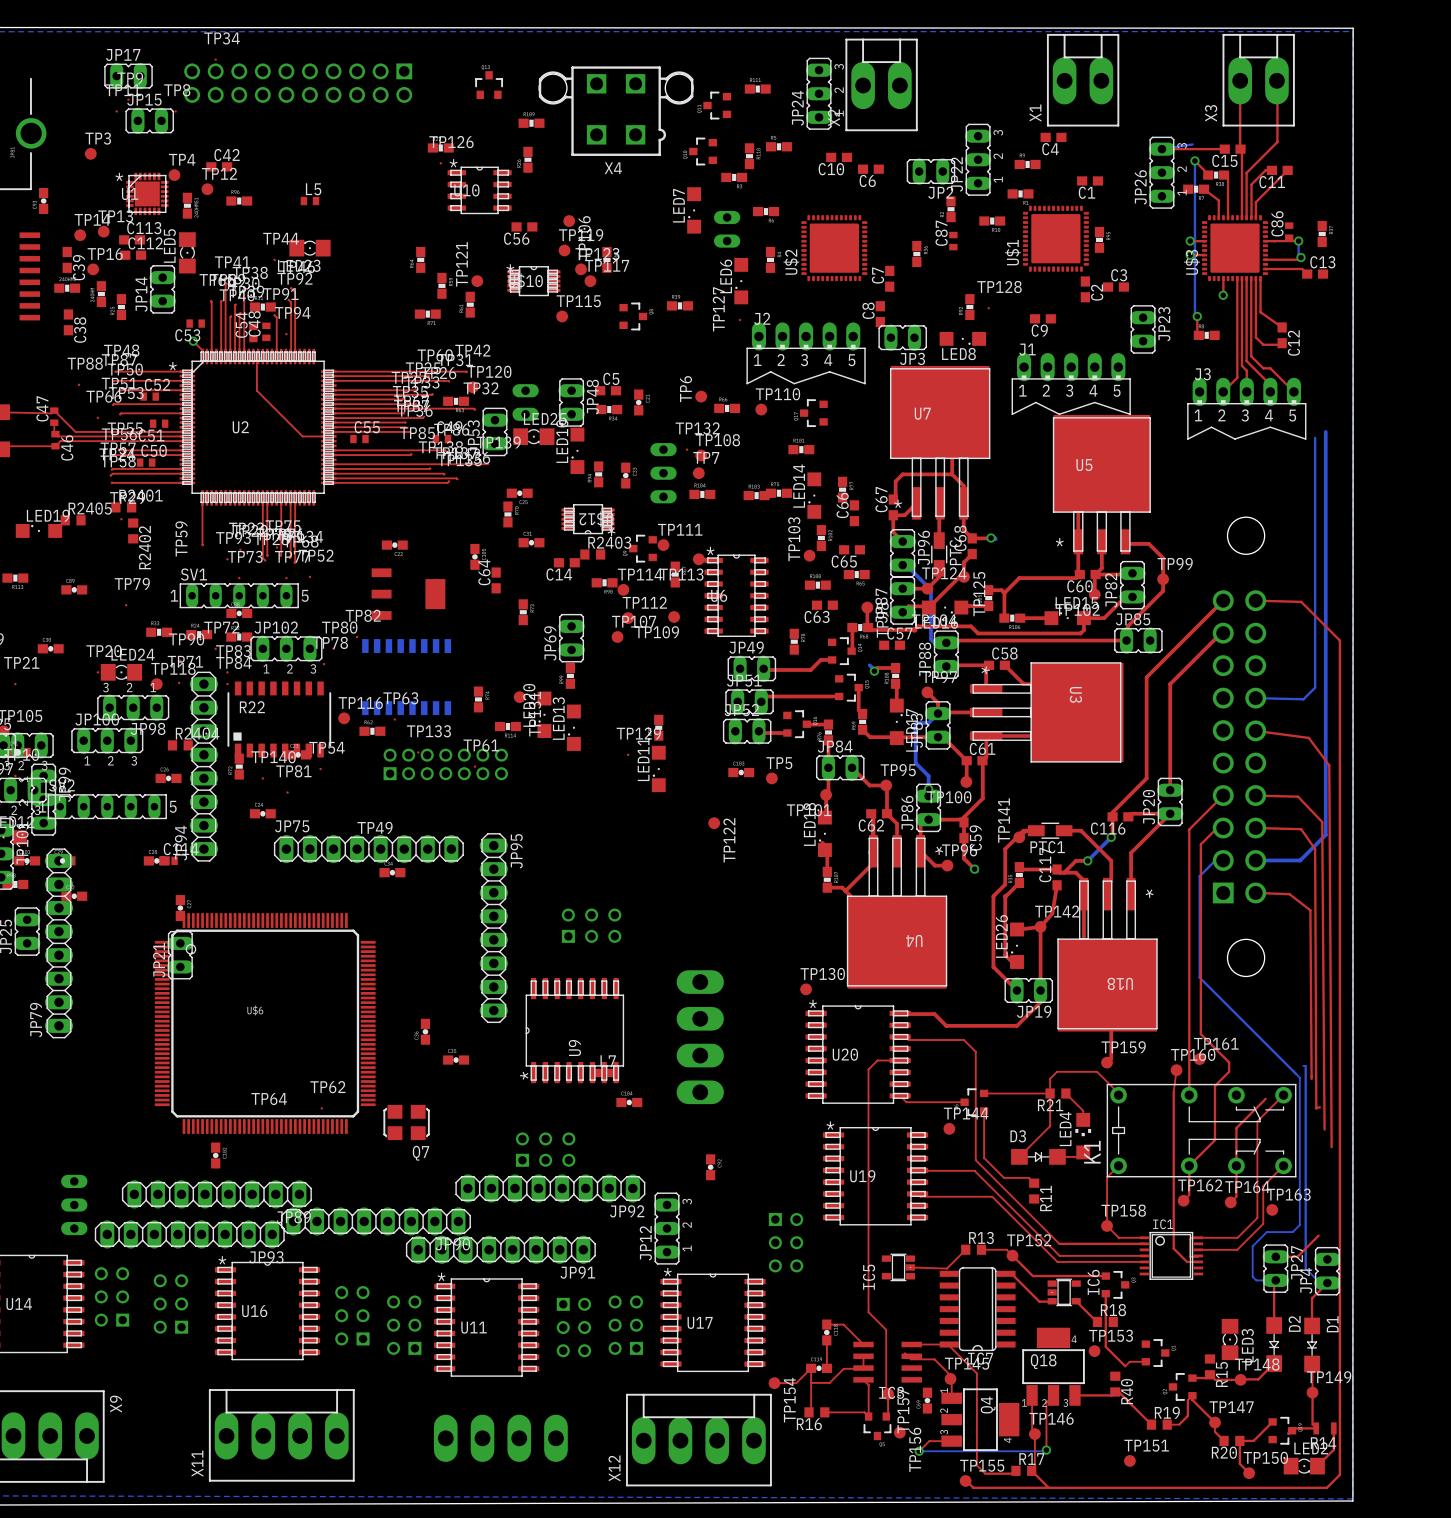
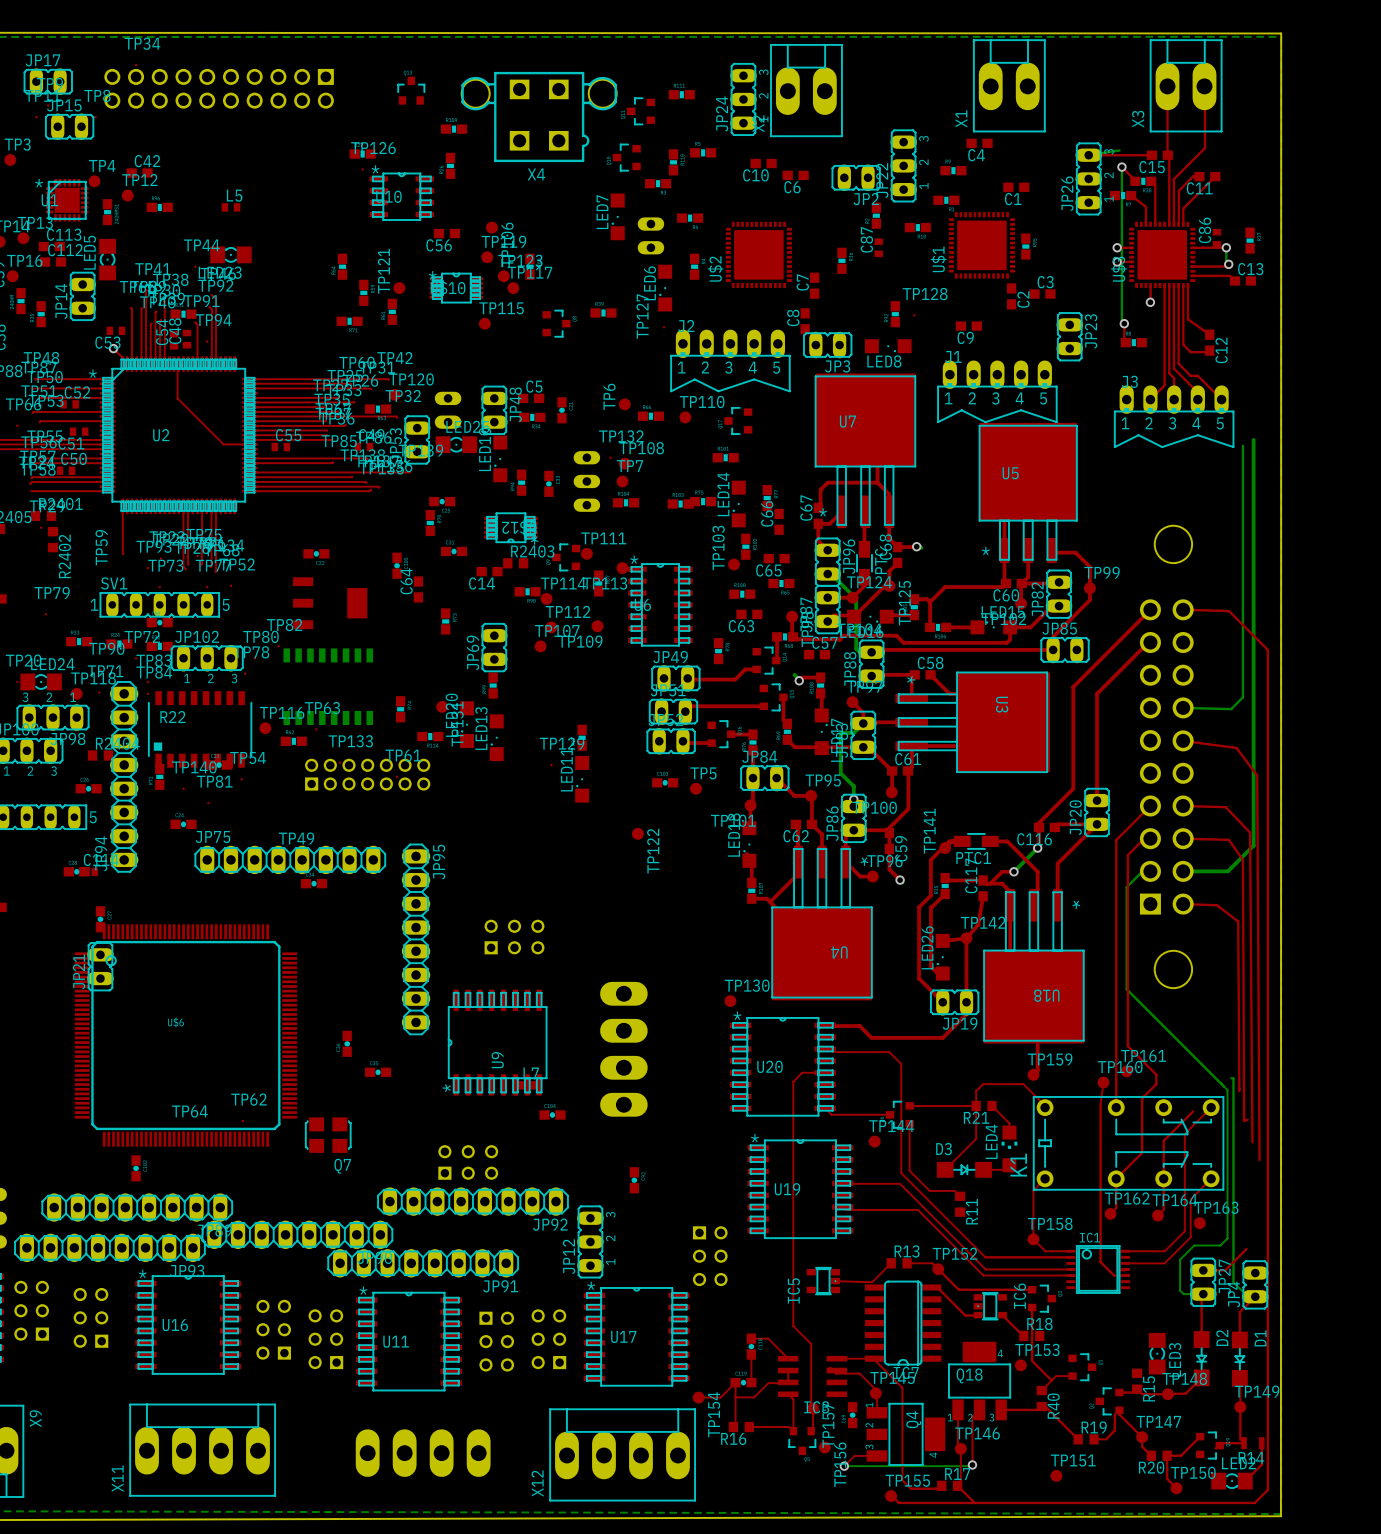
top track: none -> (1051, 1380) (1041, 1390)

